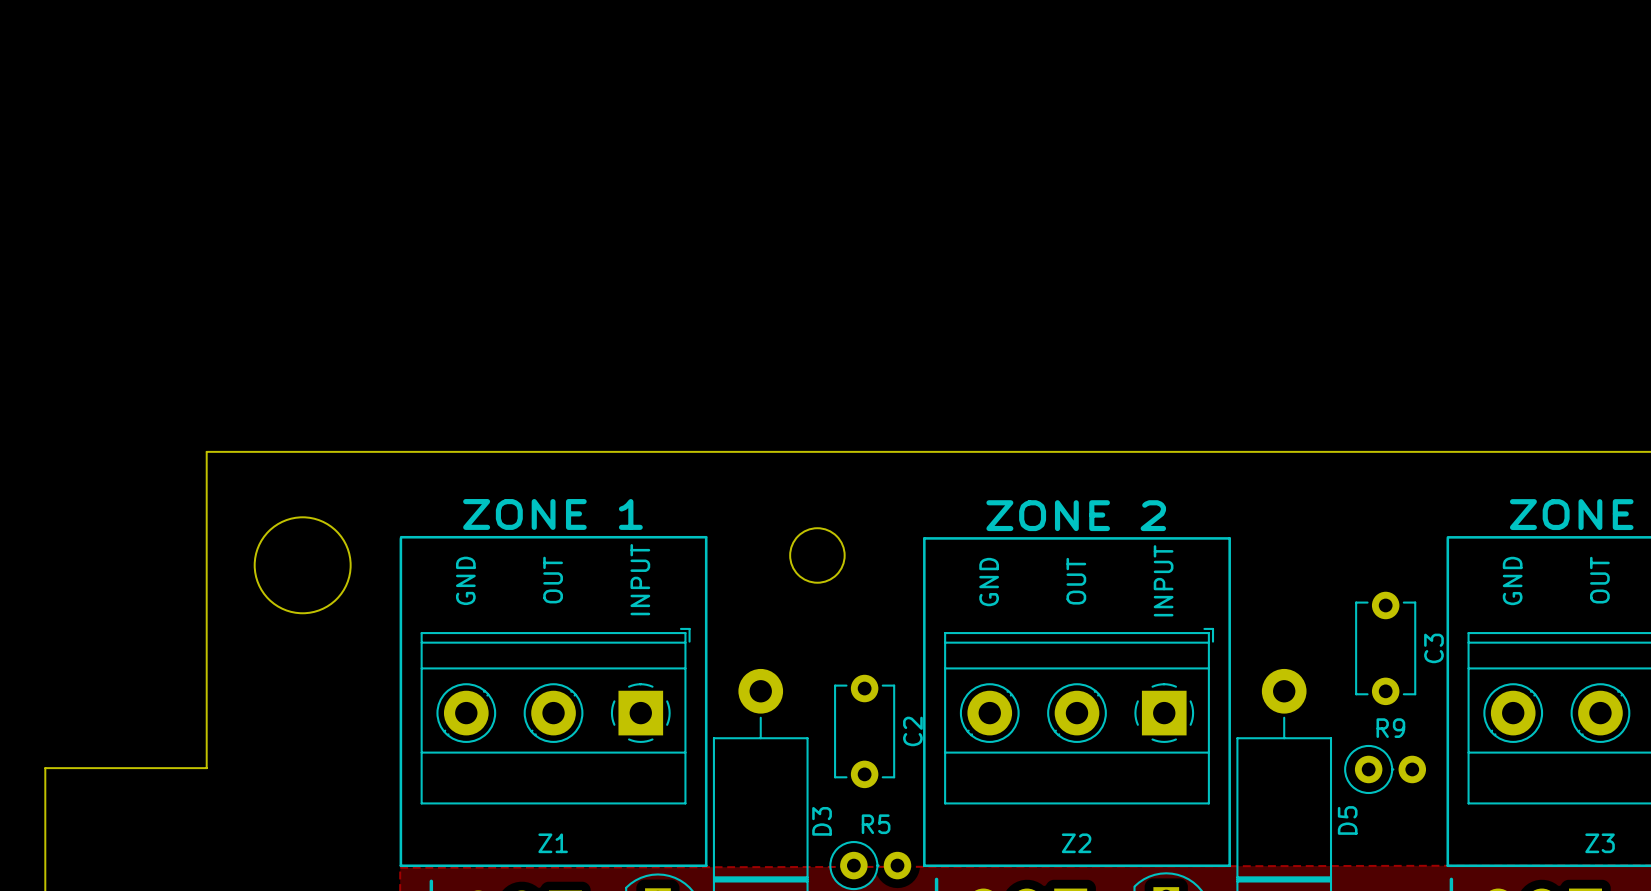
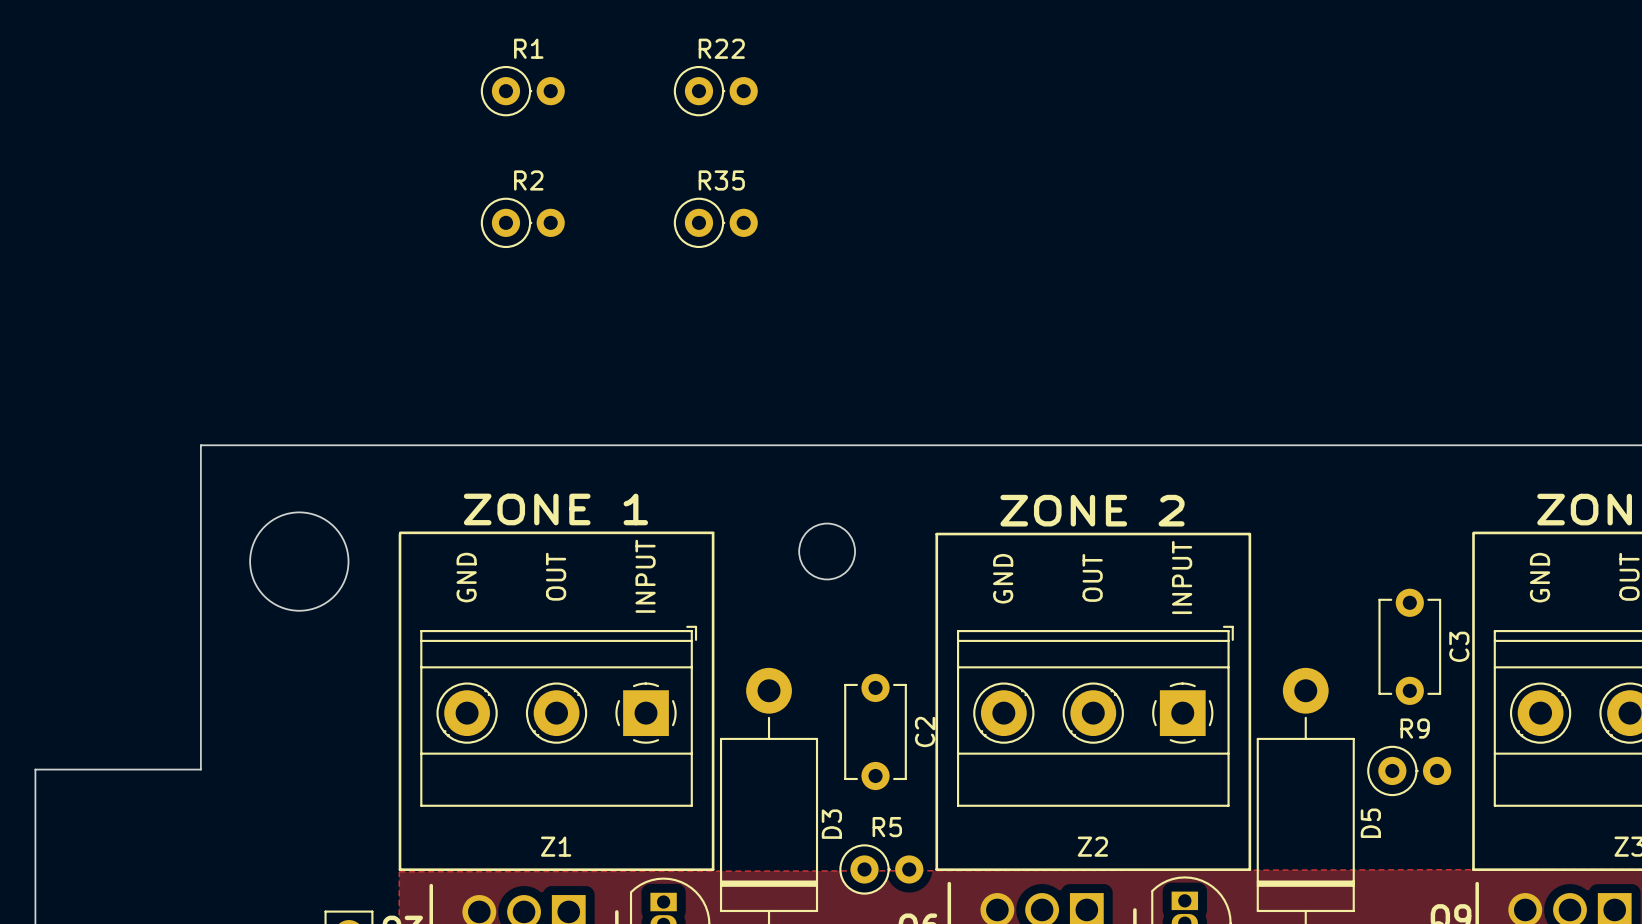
R1: none -> (522, 91)
R22: none -> (715, 91)
R2: none -> (522, 222)
R35: none -> (715, 222)

